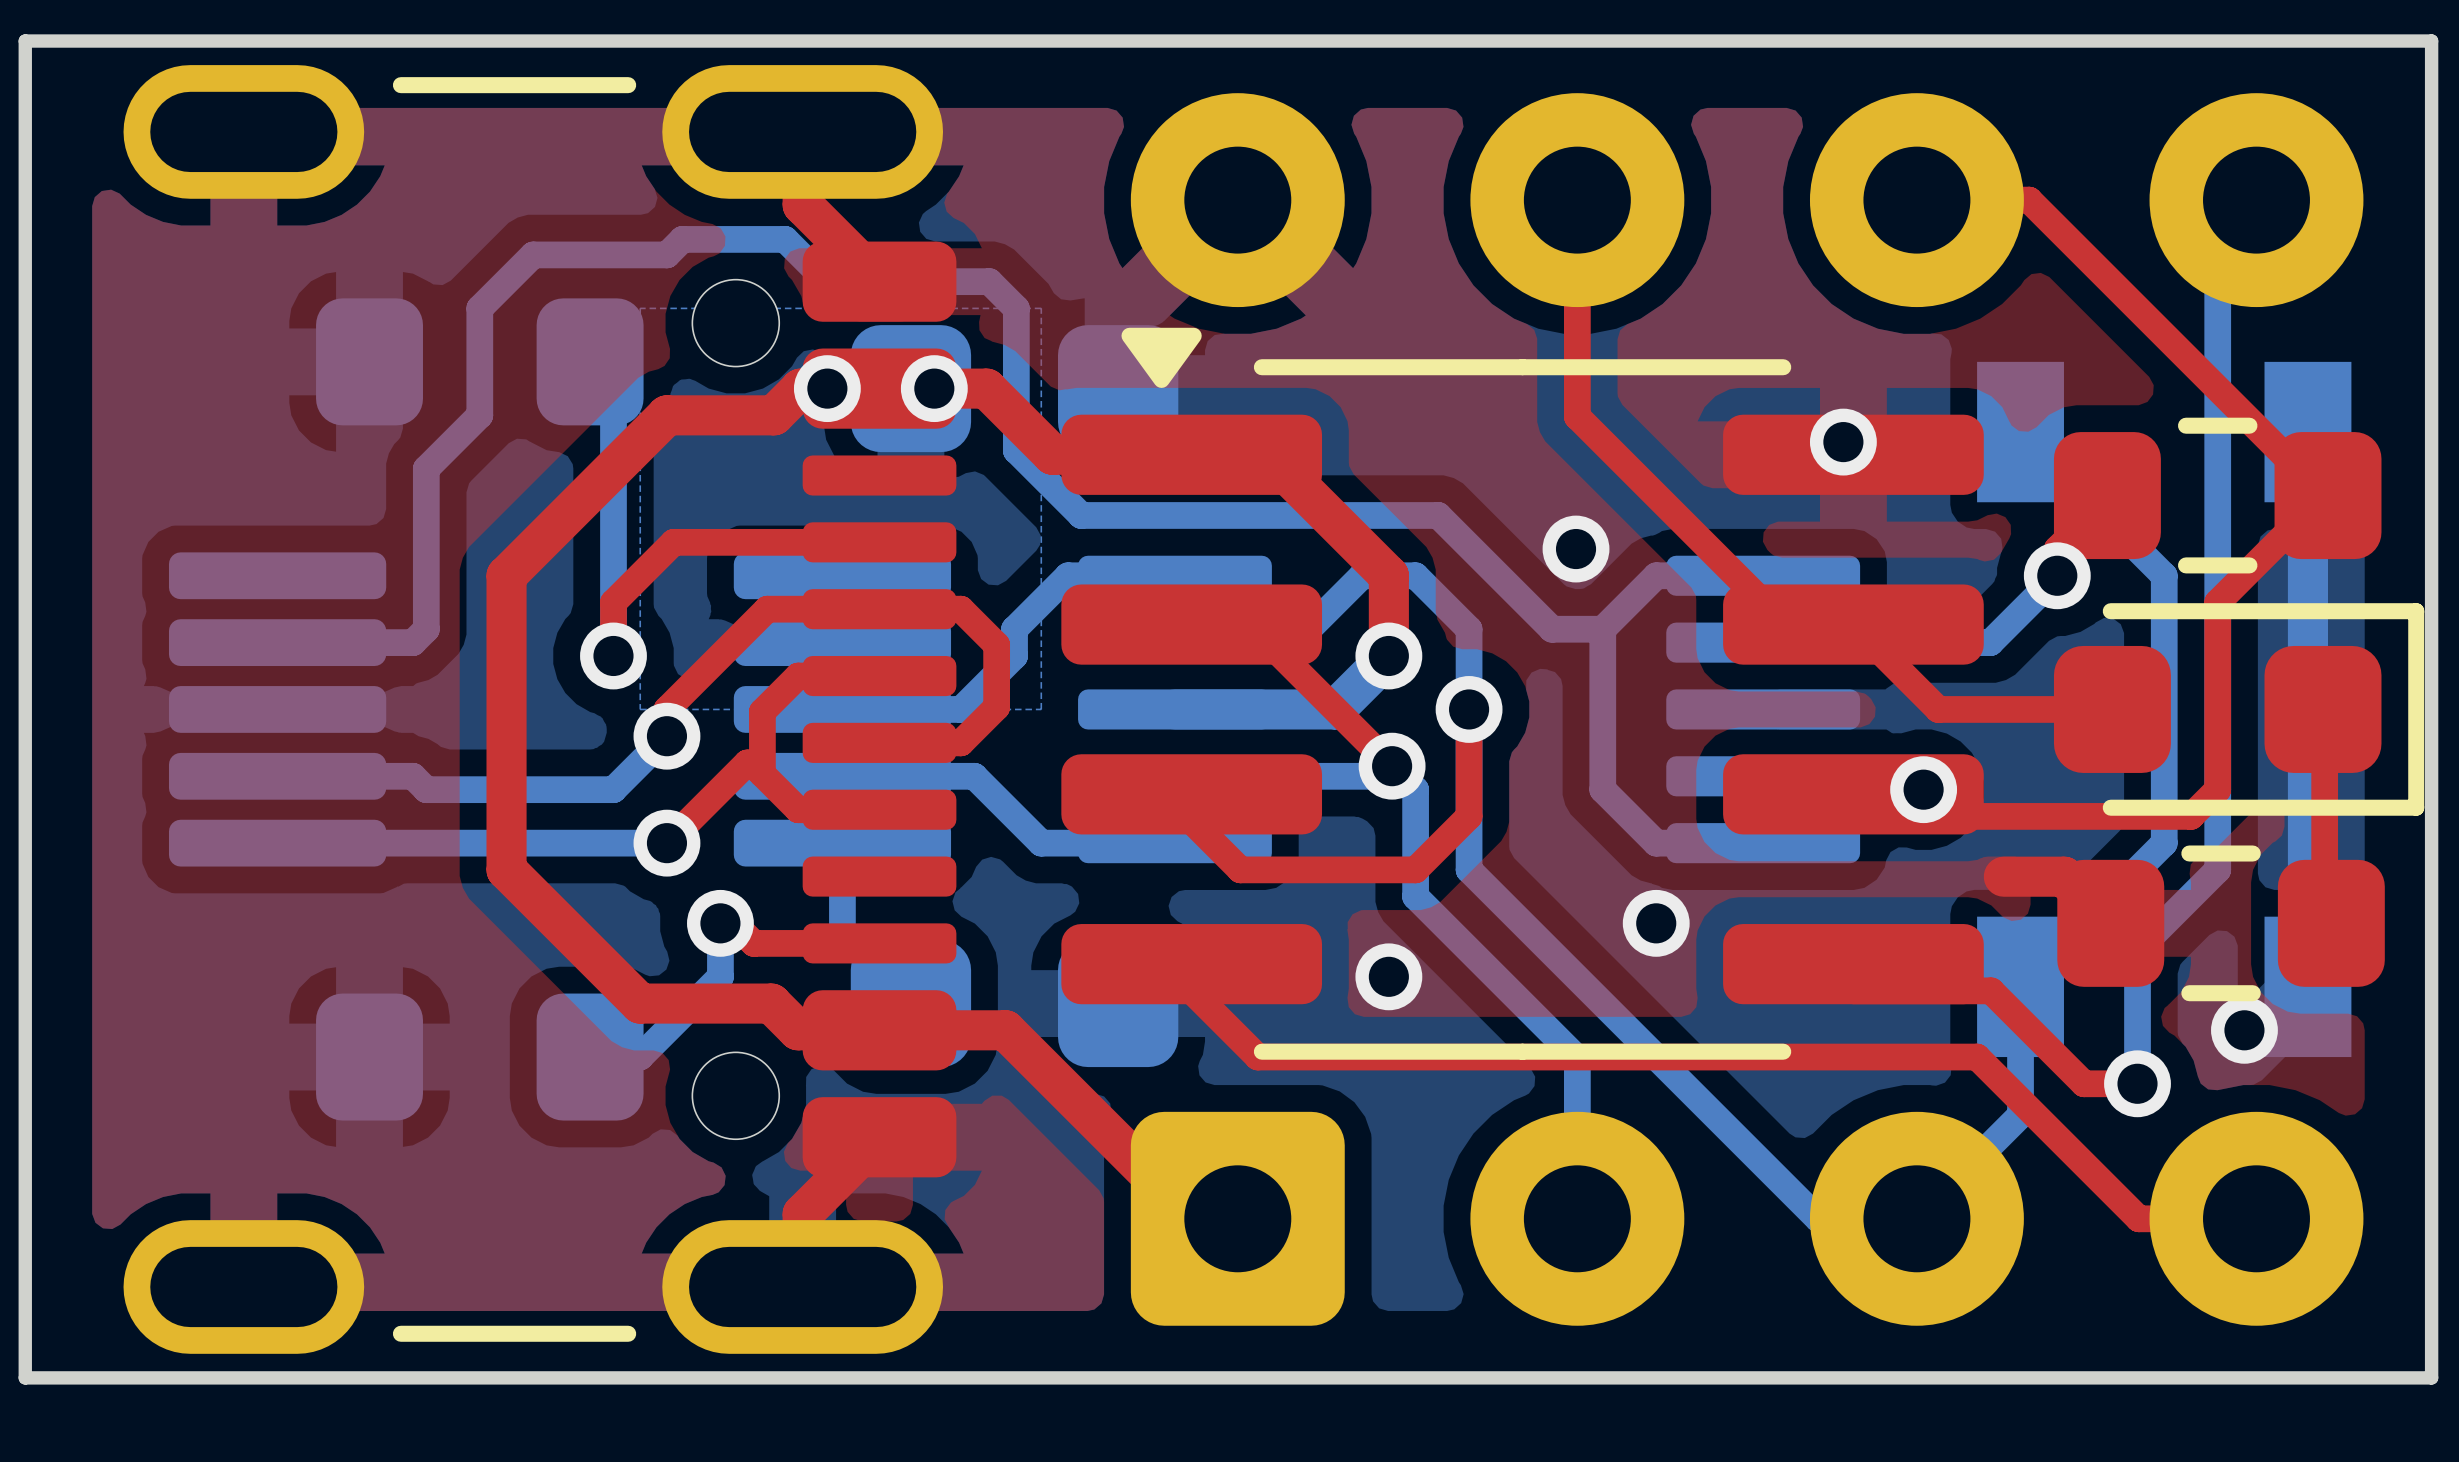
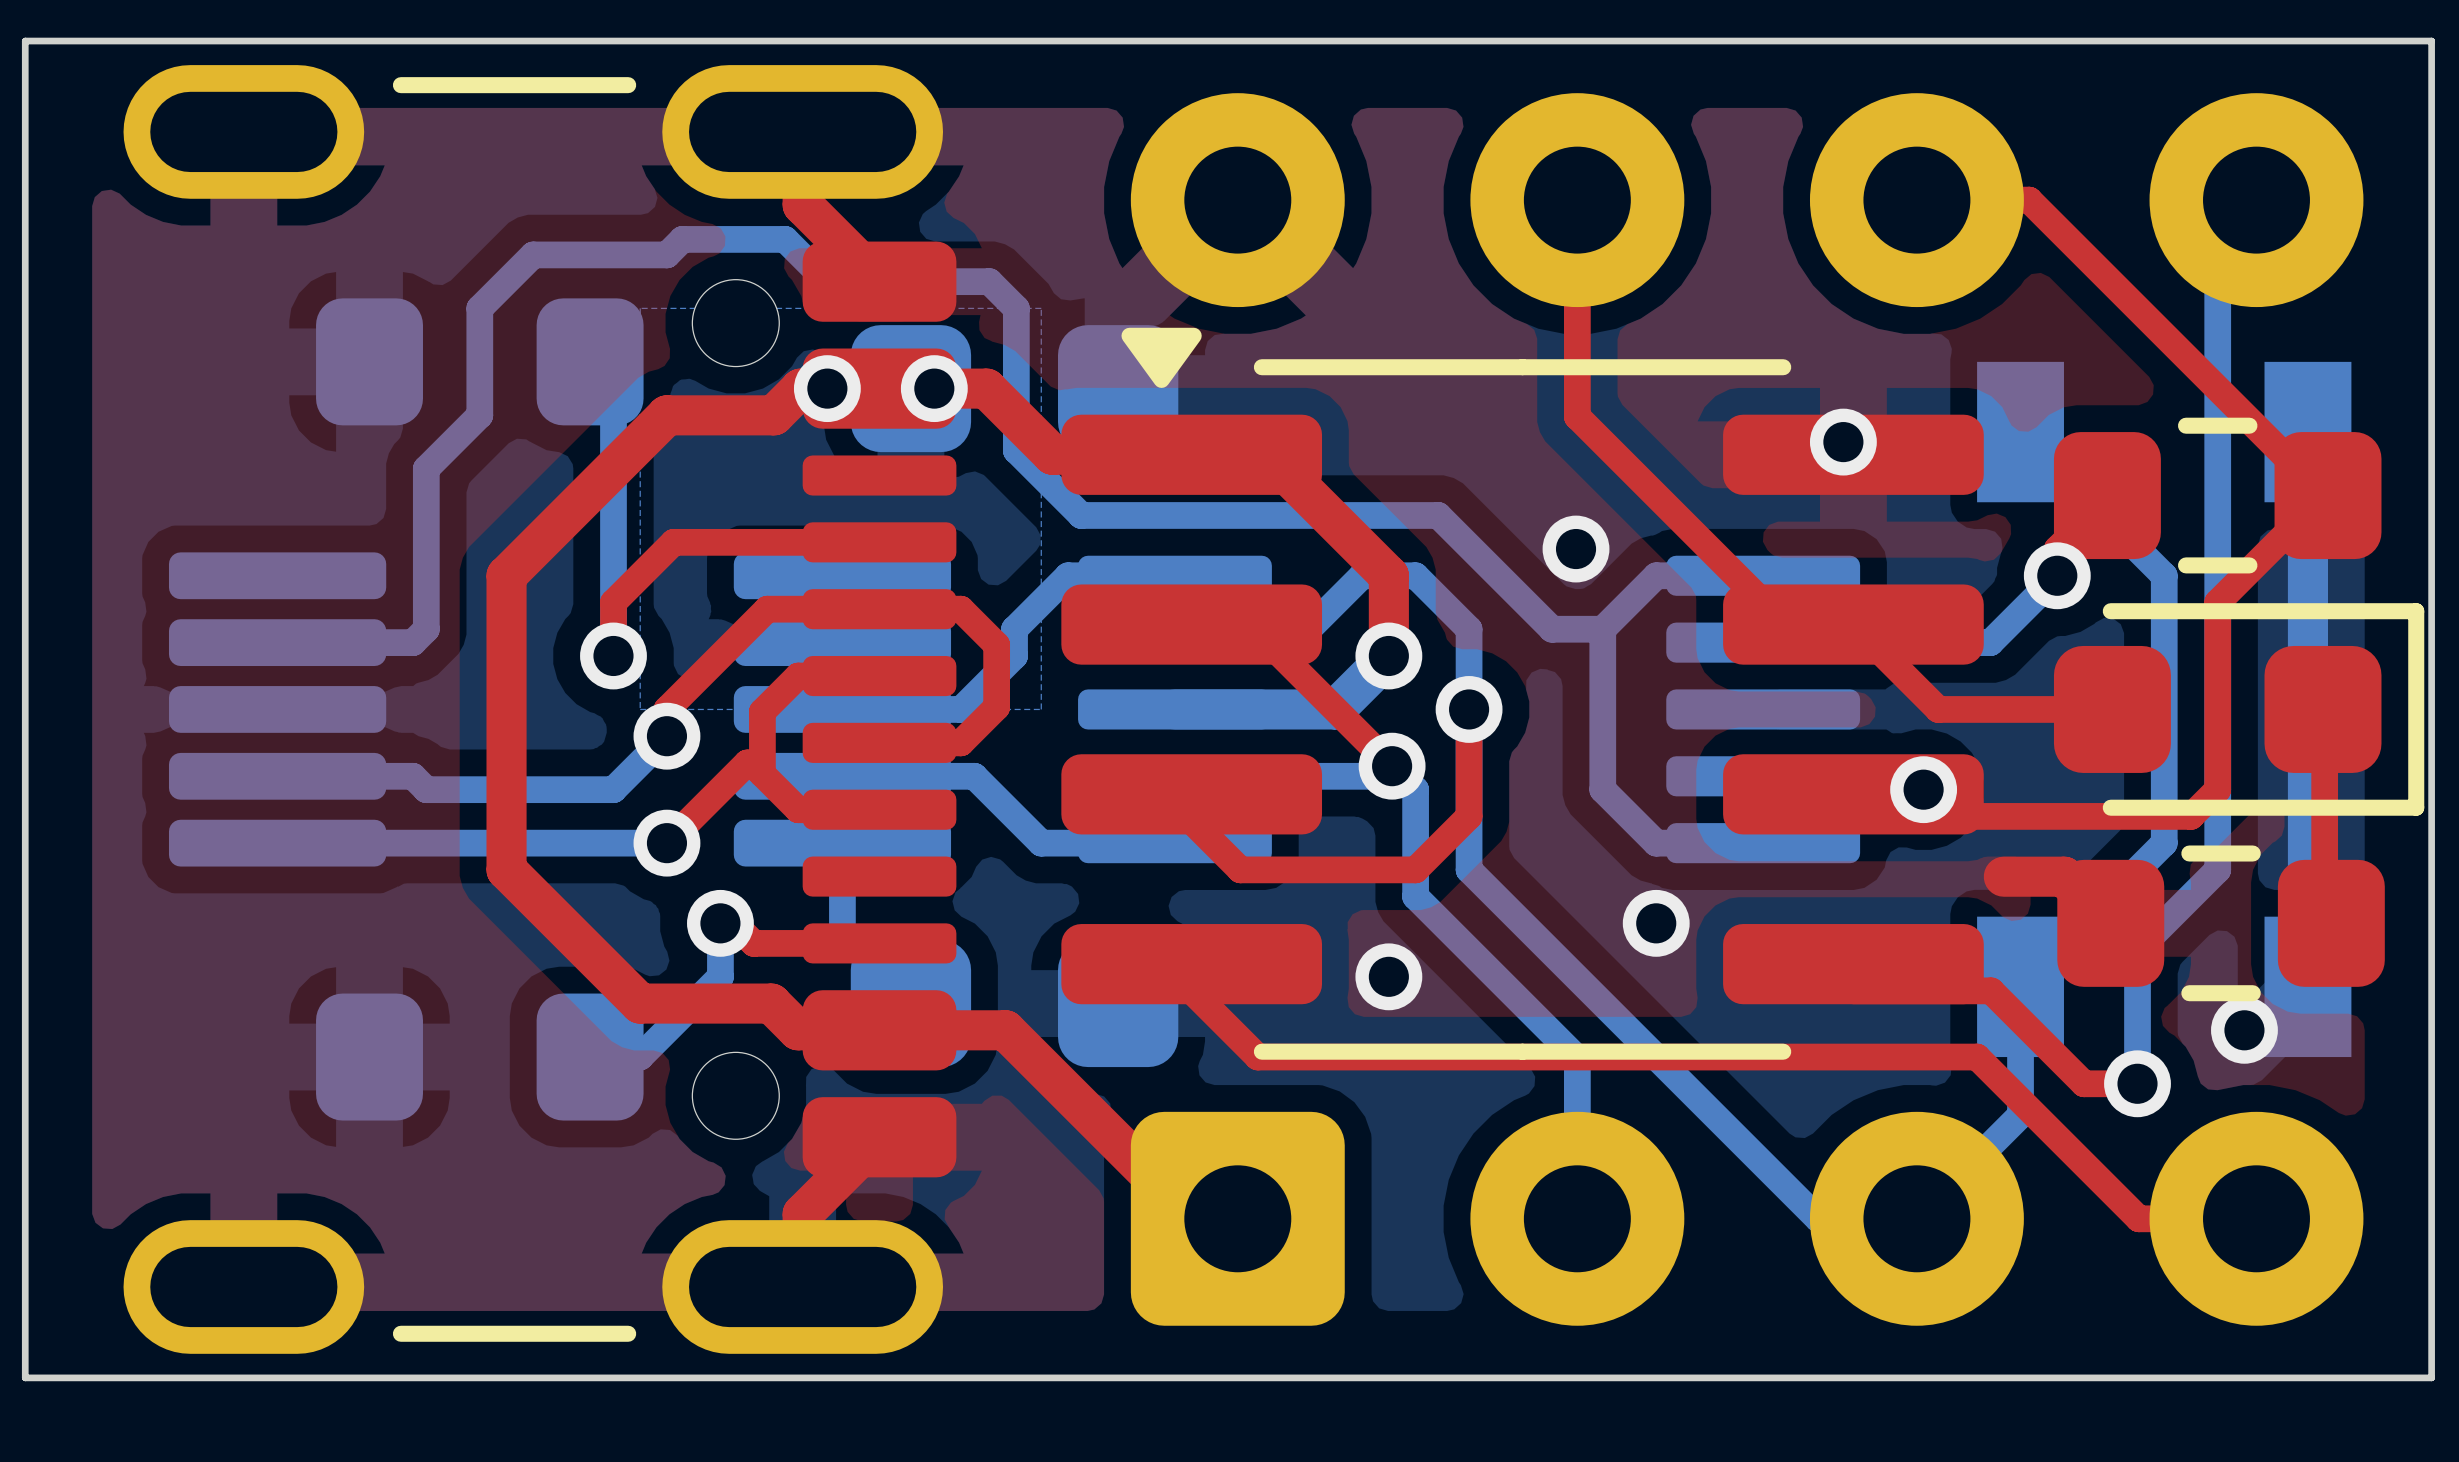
board edge width: thick (25, 41) (25, 1377) (2431, 1377) (2431, 41) (25, 41) -> thin (25, 41) (25, 1377) (2431, 1377) (2431, 41) (25, 41)

